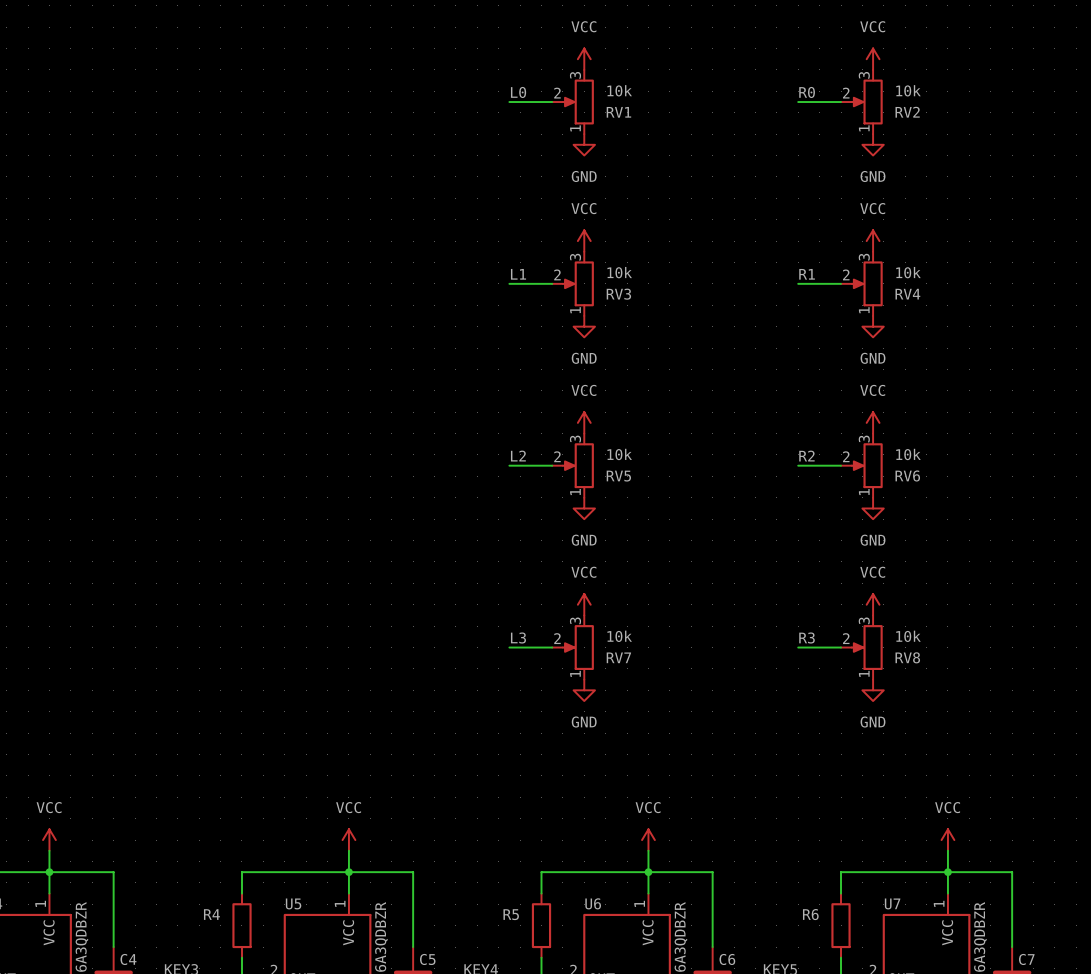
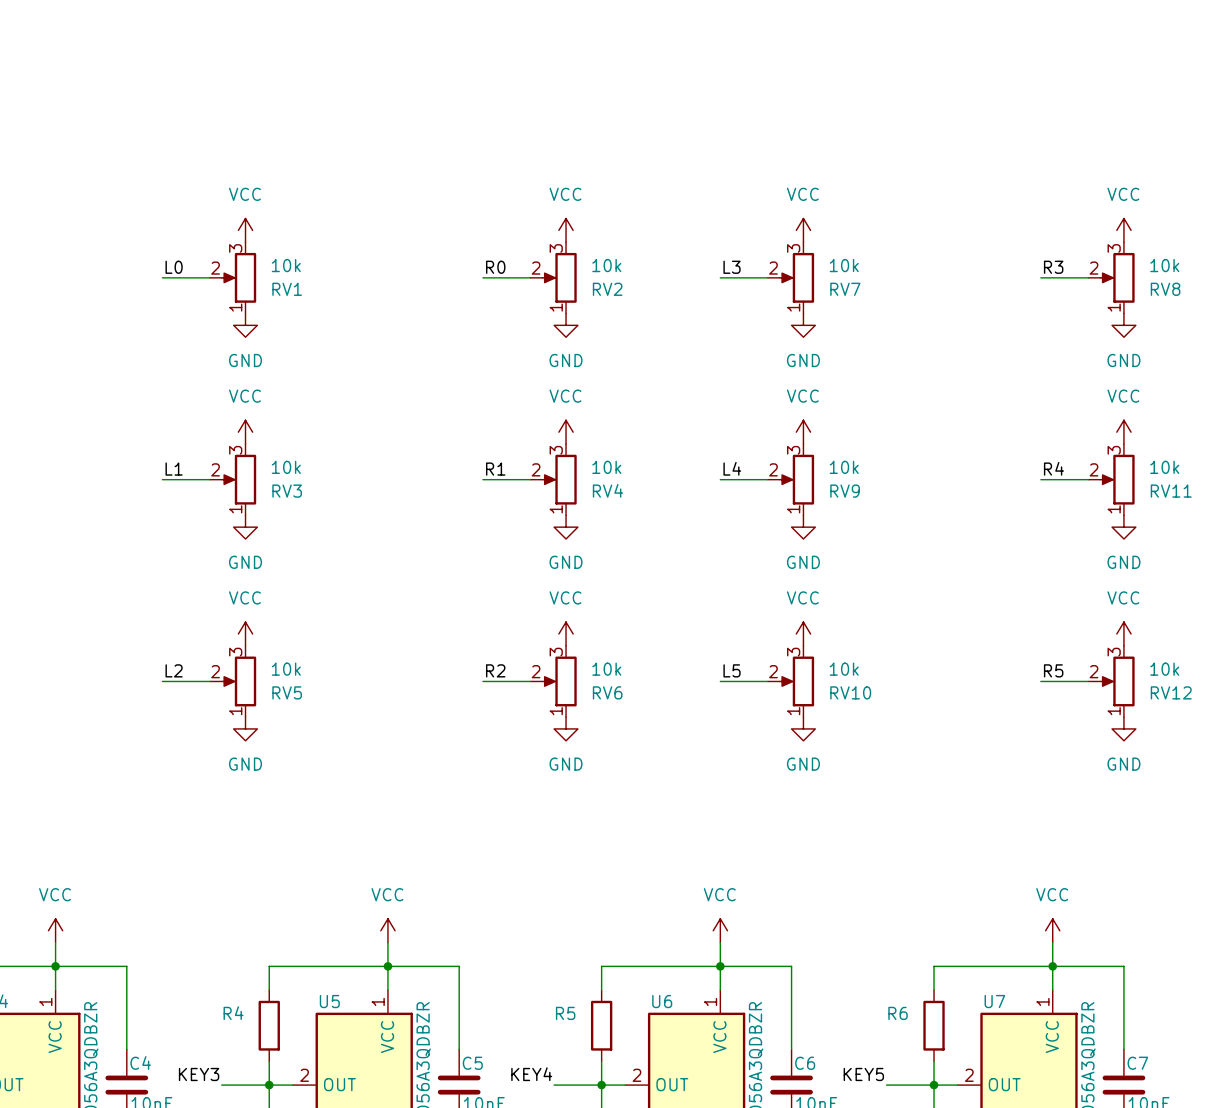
power symbol: VCC (584, 59) -> none
power symbol: VCC (873, 59) -> none
label: L0 (518, 92) -> none
label: R0 (807, 92) -> none
wire: (509, 102) (552, 102) -> (482, 277) (530, 277)
RV1 position: (573, 102) -> (233, 277)
wire: (798, 102) (841, 102) -> none
RV2 position: (861, 102) -> (553, 277)
power symbol: GND (584, 144) -> none
power symbol: GND (873, 144) -> none
power symbol: none -> VCC (245, 230)
power symbol: none -> VCC (566, 230)
power symbol: none -> VCC (803, 230)
power symbol: none -> VCC (1123, 230)
power symbol: VCC (584, 241) -> none
power symbol: VCC (873, 241) -> none
label: none -> L0 (174, 267)
label: none -> R0 (495, 267)
label: none -> L3 (732, 267)
label: none -> R3 (1053, 267)
wire: none -> (162, 277) (209, 277)
label: L1 (518, 274) -> none
label: R1 (807, 274) -> none
wire: (509, 283) (552, 283) -> (720, 277) (767, 277)
RV3 position: (573, 283) -> (233, 479)
wire: (798, 283) (841, 283) -> (1040, 277) (1088, 277)
RV4 position: (861, 283) -> (553, 479)
power symbol: none -> GND (245, 325)
power symbol: none -> GND (566, 325)
power symbol: none -> GND (803, 325)
power symbol: none -> GND (1123, 325)
power symbol: GND (584, 326) -> none
power symbol: GND (873, 326) -> none
power symbol: none -> VCC (245, 432)
power symbol: none -> VCC (566, 432)
power symbol: none -> VCC (803, 432)
power symbol: none -> VCC (1123, 432)
power symbol: VCC (584, 422) -> none
power symbol: VCC (873, 422) -> none
label: none -> L1 (174, 469)
label: none -> R1 (495, 469)
label: none -> L4 (732, 468)
label: none -> R4 (1053, 468)
wire: none -> (162, 479) (209, 479)
wire: none -> (482, 479) (530, 479)
RV9: none -> 10k (790, 479)
RV11: none -> 10k (1111, 479)
label: L2 (518, 456) -> none
label: R2 (806, 456) -> none
wire: (509, 465) (552, 465) -> (720, 479) (767, 479)
RV5 position: (573, 465) -> (233, 681)
wire: (798, 465) (841, 465) -> (1040, 479) (1088, 479)
RV6 position: (861, 465) -> (553, 681)
power symbol: none -> GND (245, 527)
power symbol: none -> GND (566, 527)
power symbol: none -> GND (803, 527)
power symbol: none -> GND (1123, 527)
power symbol: GND (584, 508) -> none
power symbol: GND (873, 508) -> none
power symbol: none -> VCC (245, 633)
power symbol: none -> VCC (566, 633)
power symbol: none -> VCC (803, 633)
power symbol: none -> VCC (1123, 633)
power symbol: VCC (584, 604) -> none
power symbol: VCC (873, 604) -> none
label: none -> L2 (174, 670)
label: none -> R2 (495, 670)
label: none -> L5 (732, 670)
label: none -> R5 (1053, 670)
wire: none -> (162, 681) (209, 681)
wire: none -> (482, 681) (530, 681)
RV10: none -> 10k (790, 681)
RV12: none -> 10k (1111, 681)
label: L3 (518, 637) -> none
label: R3 (807, 637) -> none
wire: (509, 647) (552, 647) -> (720, 681) (767, 681)
RV7 position: (573, 647) -> (790, 277)
wire: (798, 647) (841, 647) -> (1040, 681) (1088, 681)
RV8 position: (861, 647) -> (1111, 277)
power symbol: none -> GND (245, 728)
power symbol: none -> GND (566, 728)
power symbol: none -> GND (803, 728)
power symbol: none -> GND (1123, 728)
power symbol: GND (584, 690) -> none
power symbol: GND (873, 690) -> none

